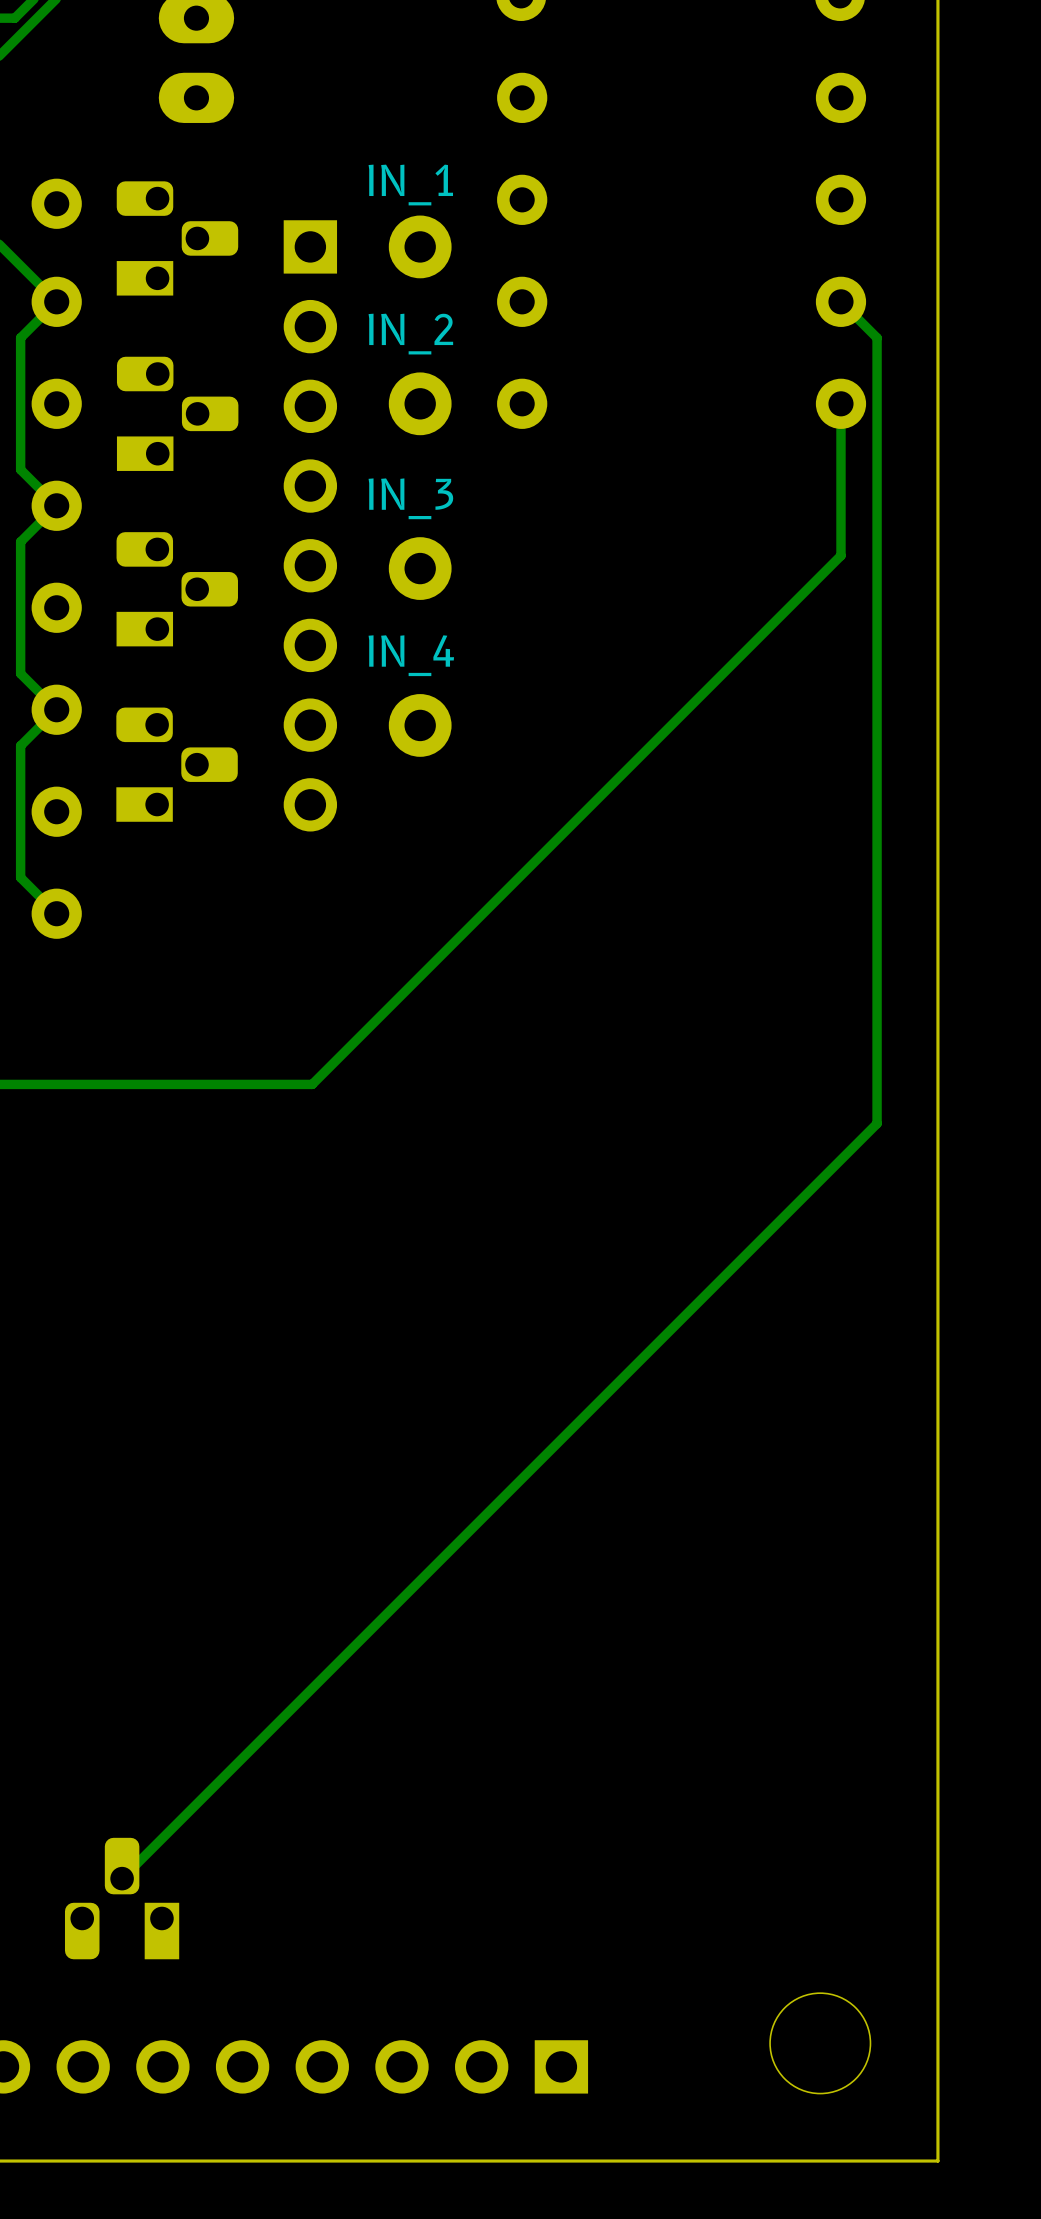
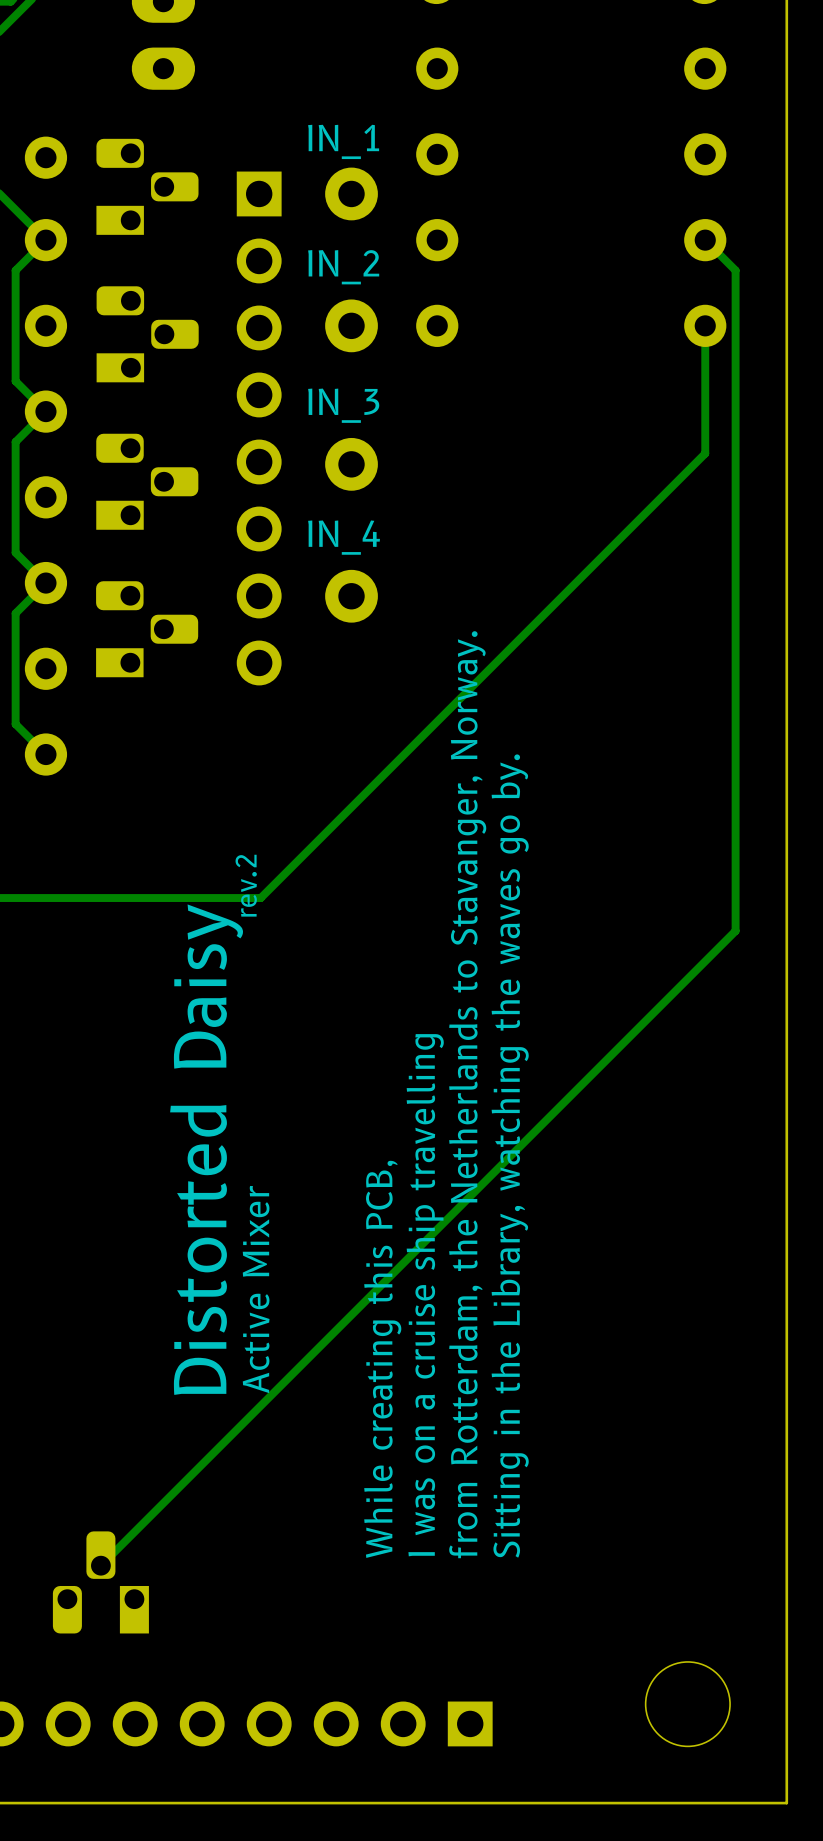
text: none -> rev.2 (246, 885)
text: none -> from Rotterdam, the Netherlands to Stavanger, Norway. (467, 1094)
text: none -> Distorted Daisy (206, 1149)
text: none -> Sitting in the Library, watching the waves go by. (510, 1156)
text: none -> Active Mixer (256, 1289)
text: none -> I was on a cruise ship travelling (425, 1295)
text: none -> While creating this PCB, (382, 1359)

